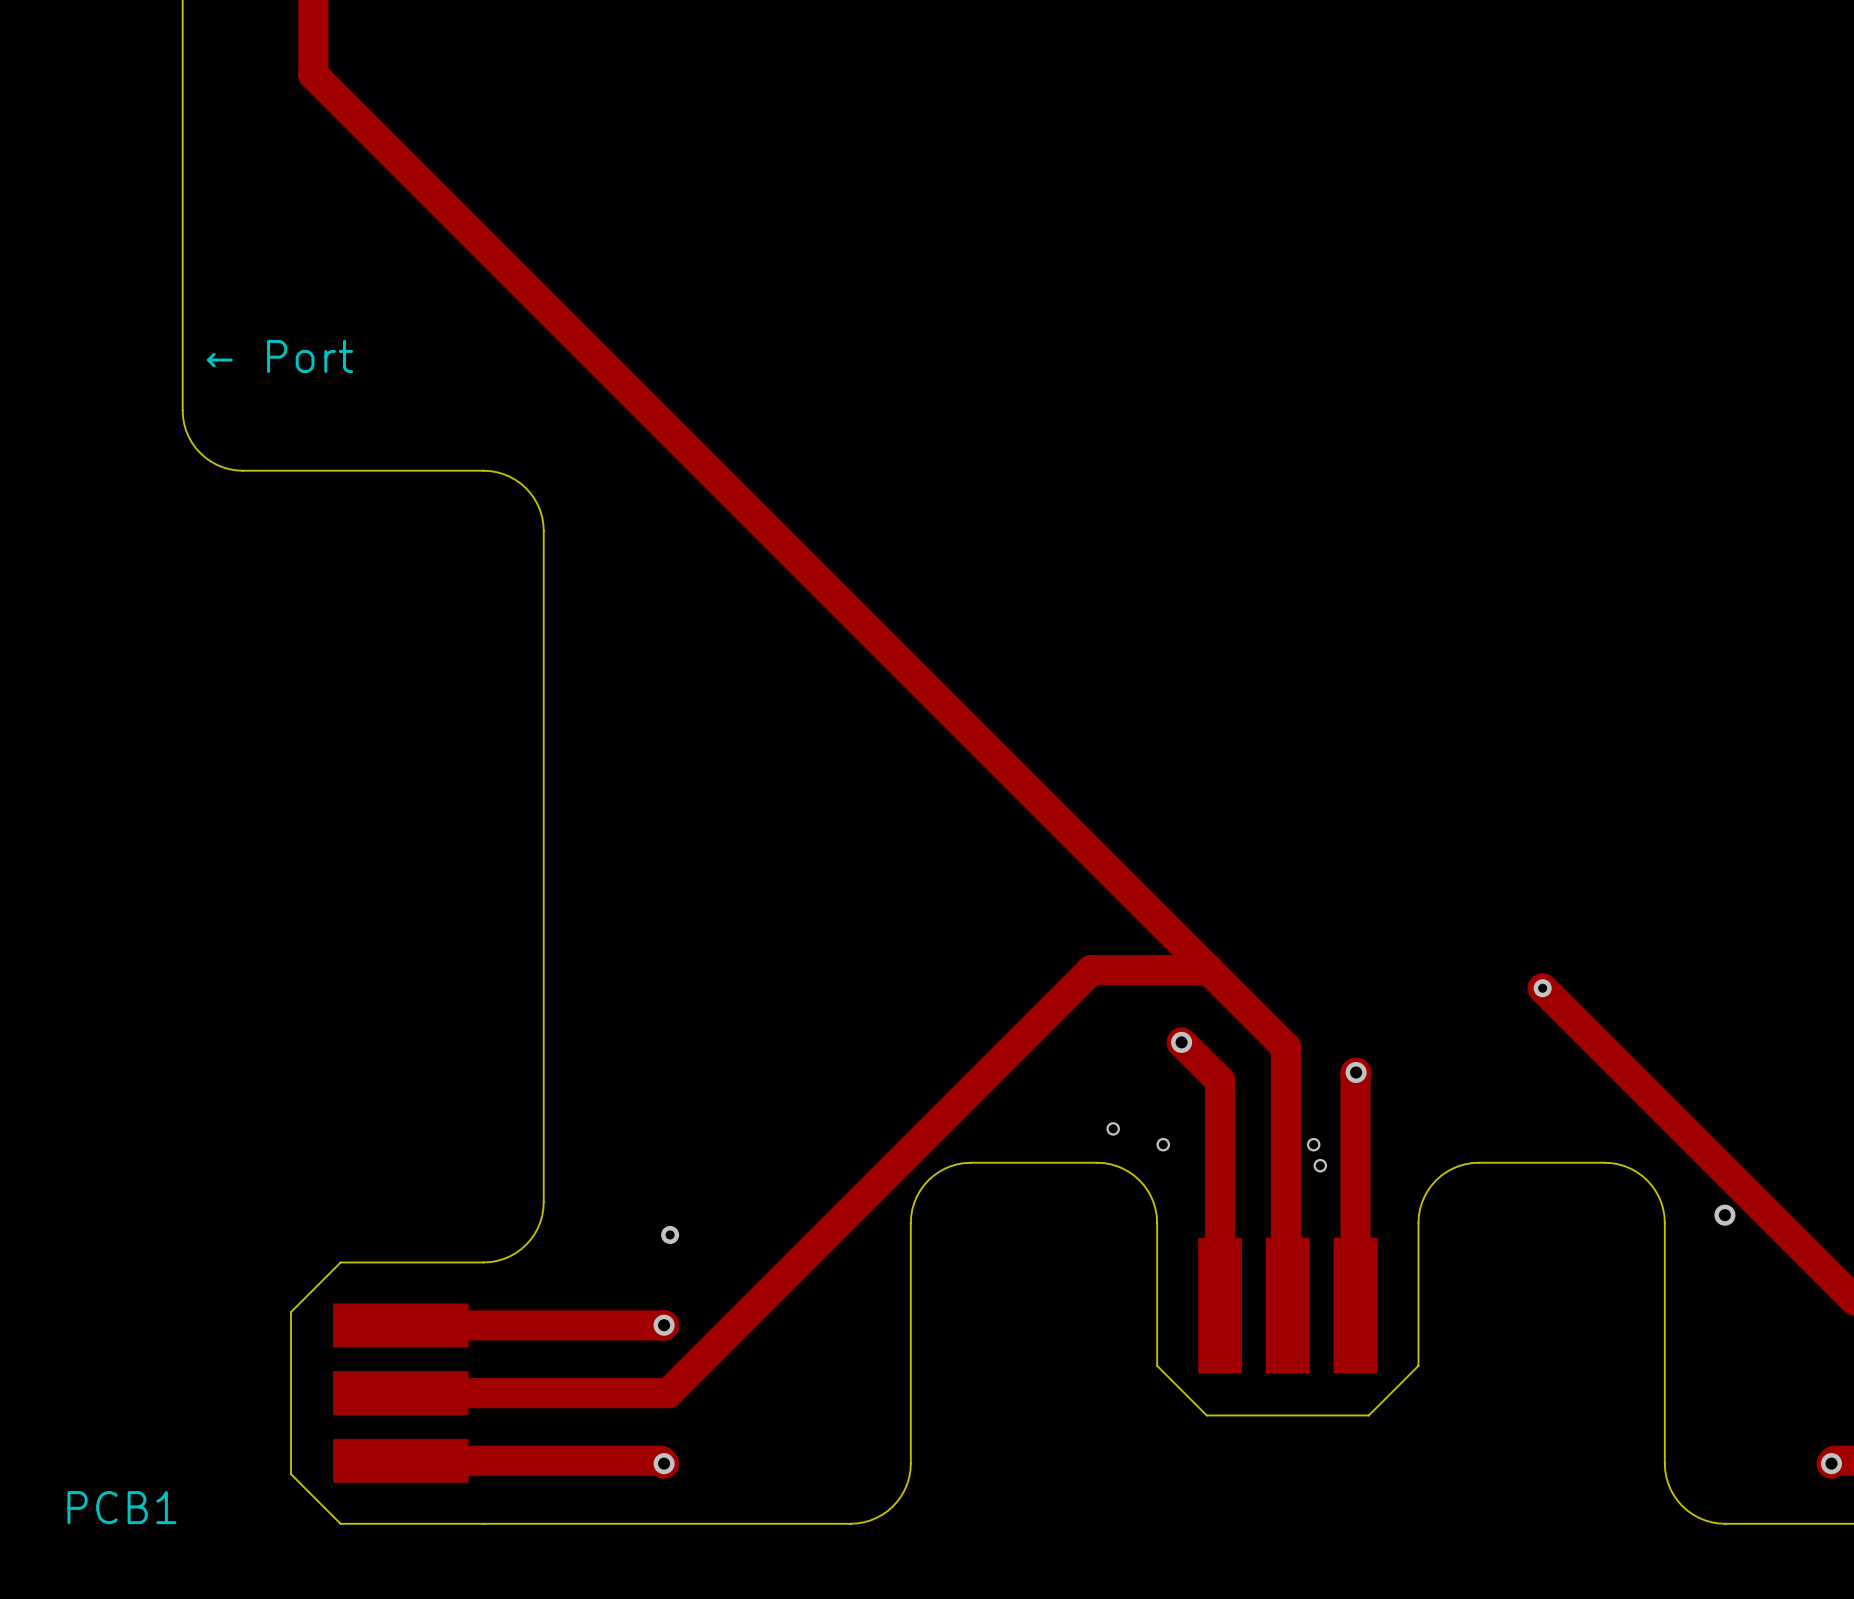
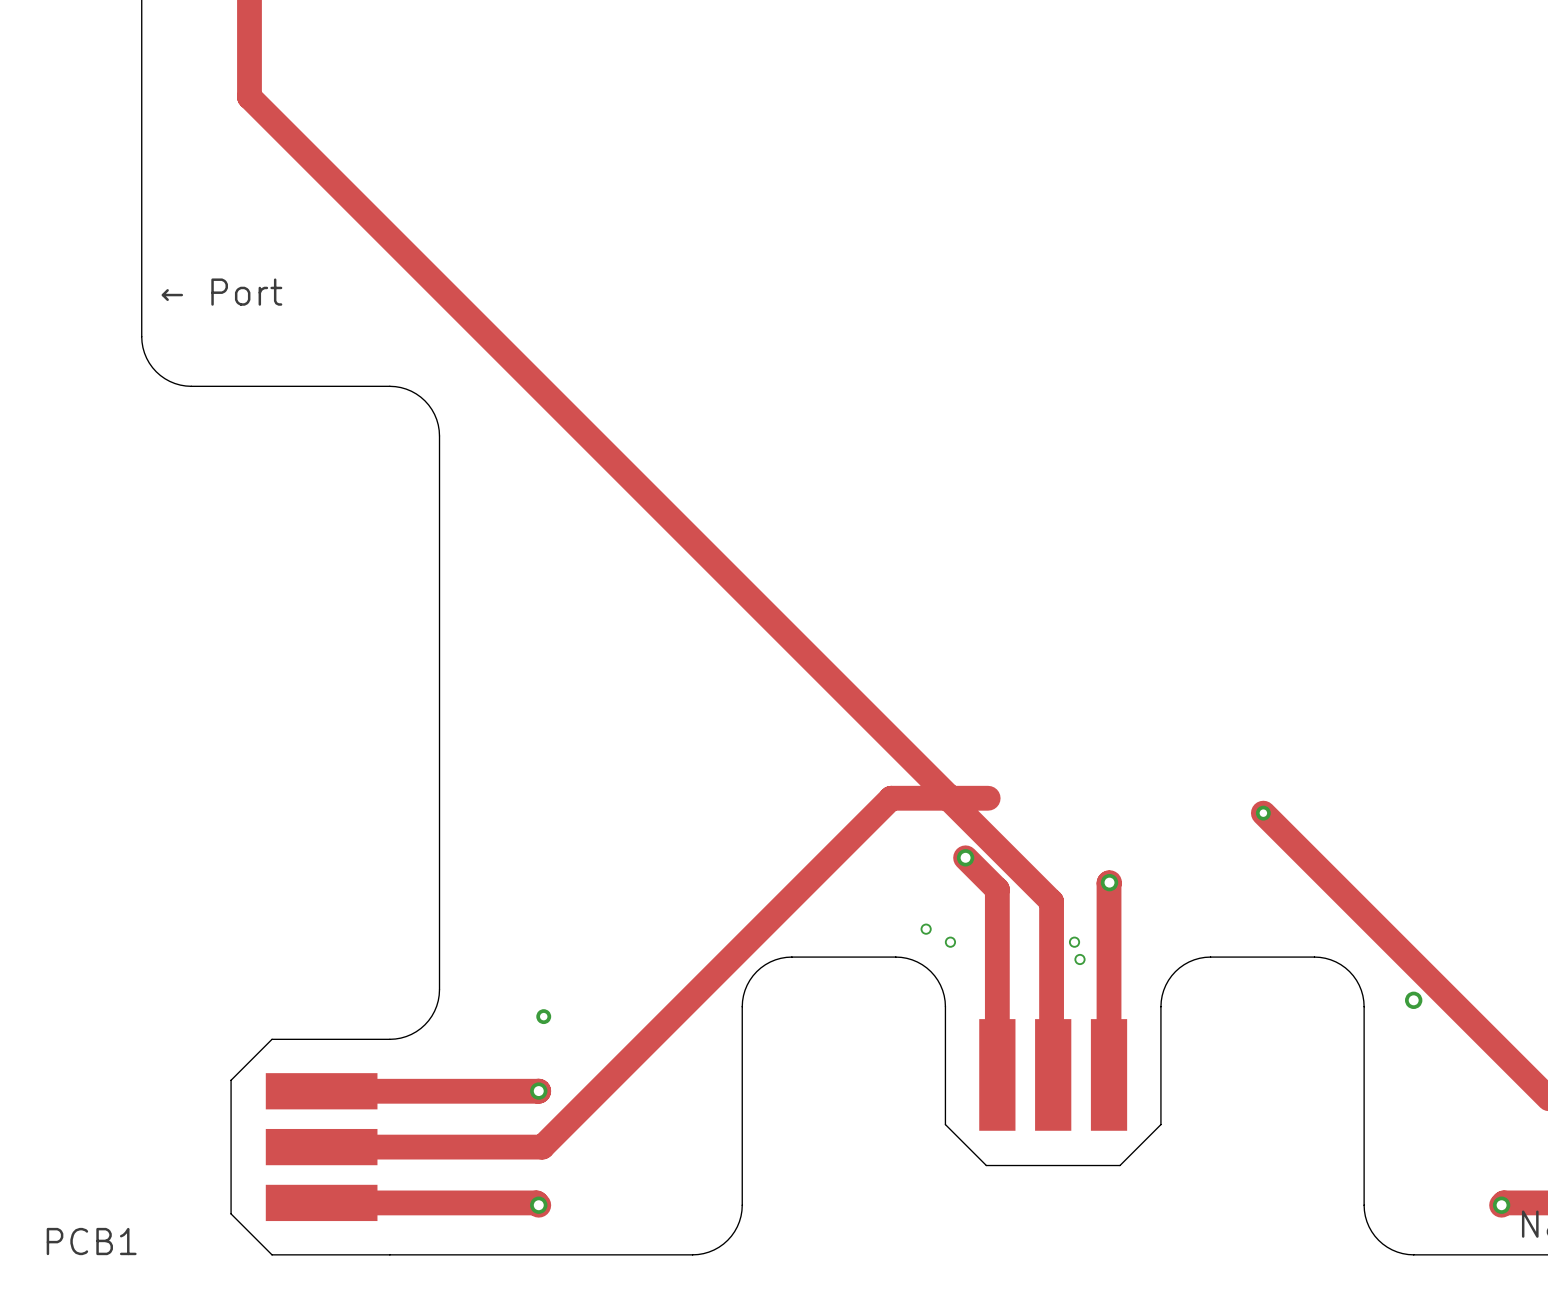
track: (313, 74) (1285, 1047) (1285, 1095) -> (249, 59) (249, 97) (948, 795) (948, 798) (1051, 901)
via position: (1113, 1128) -> (926, 929)

